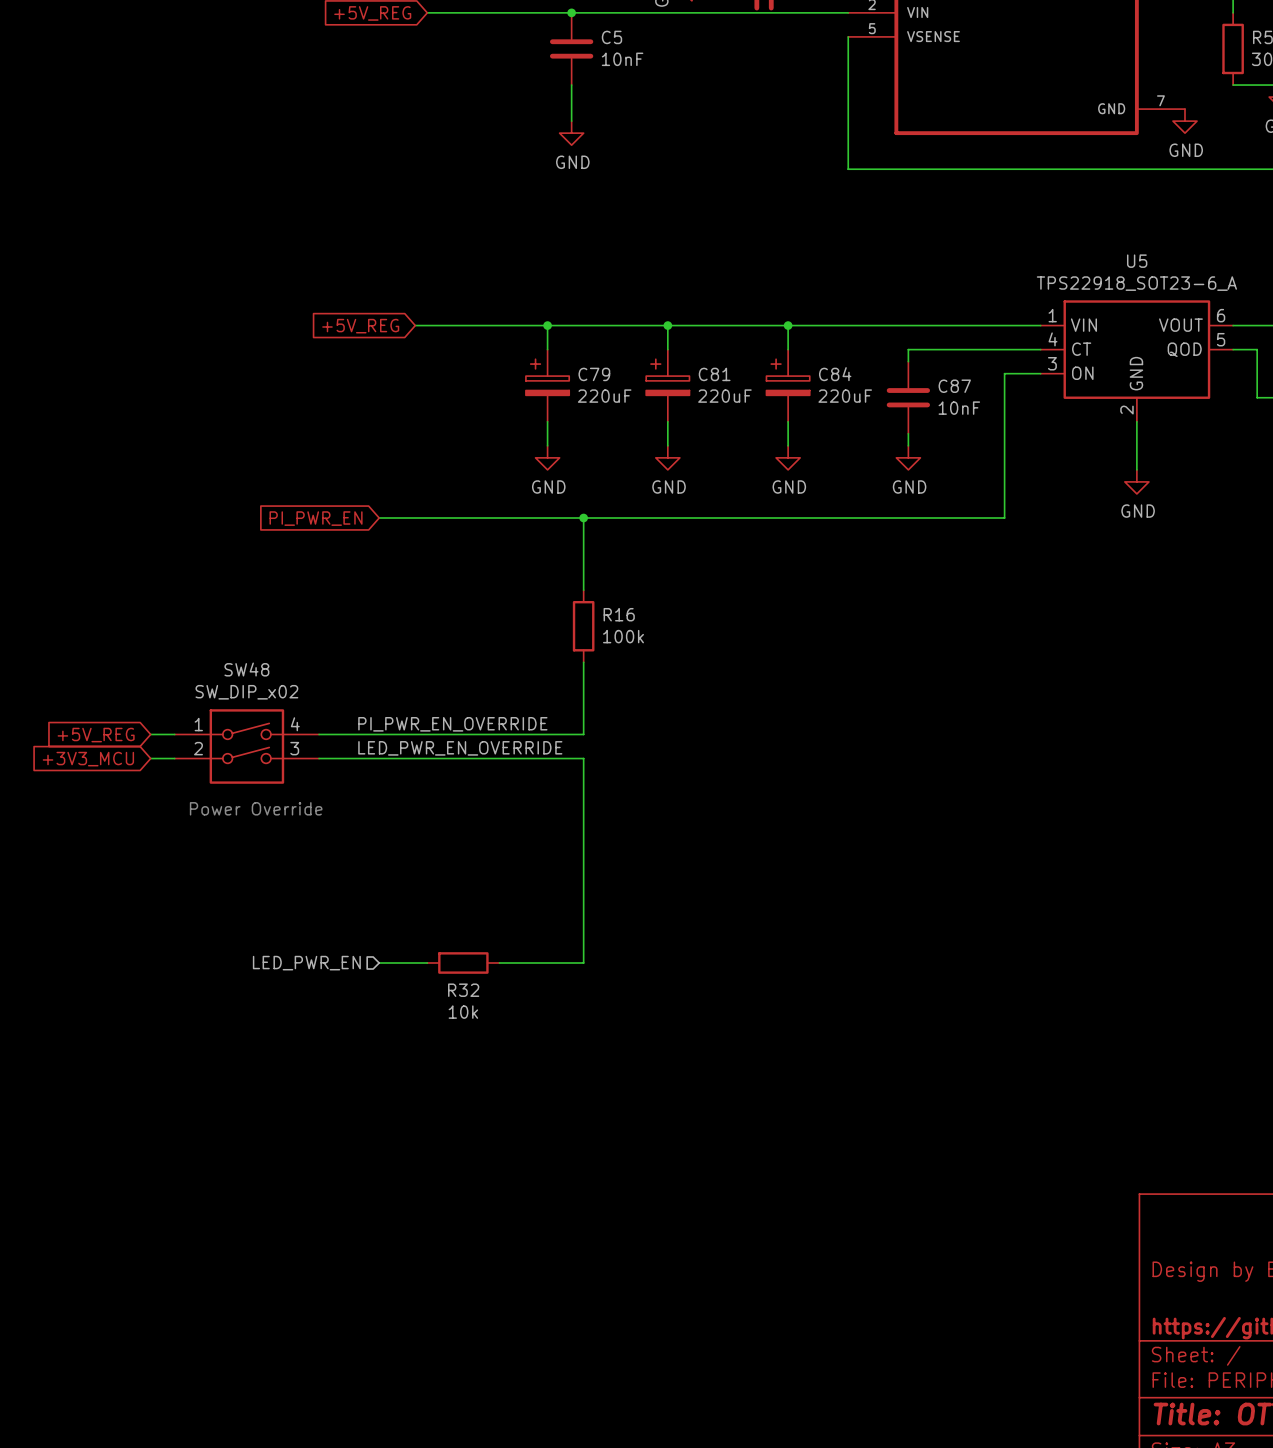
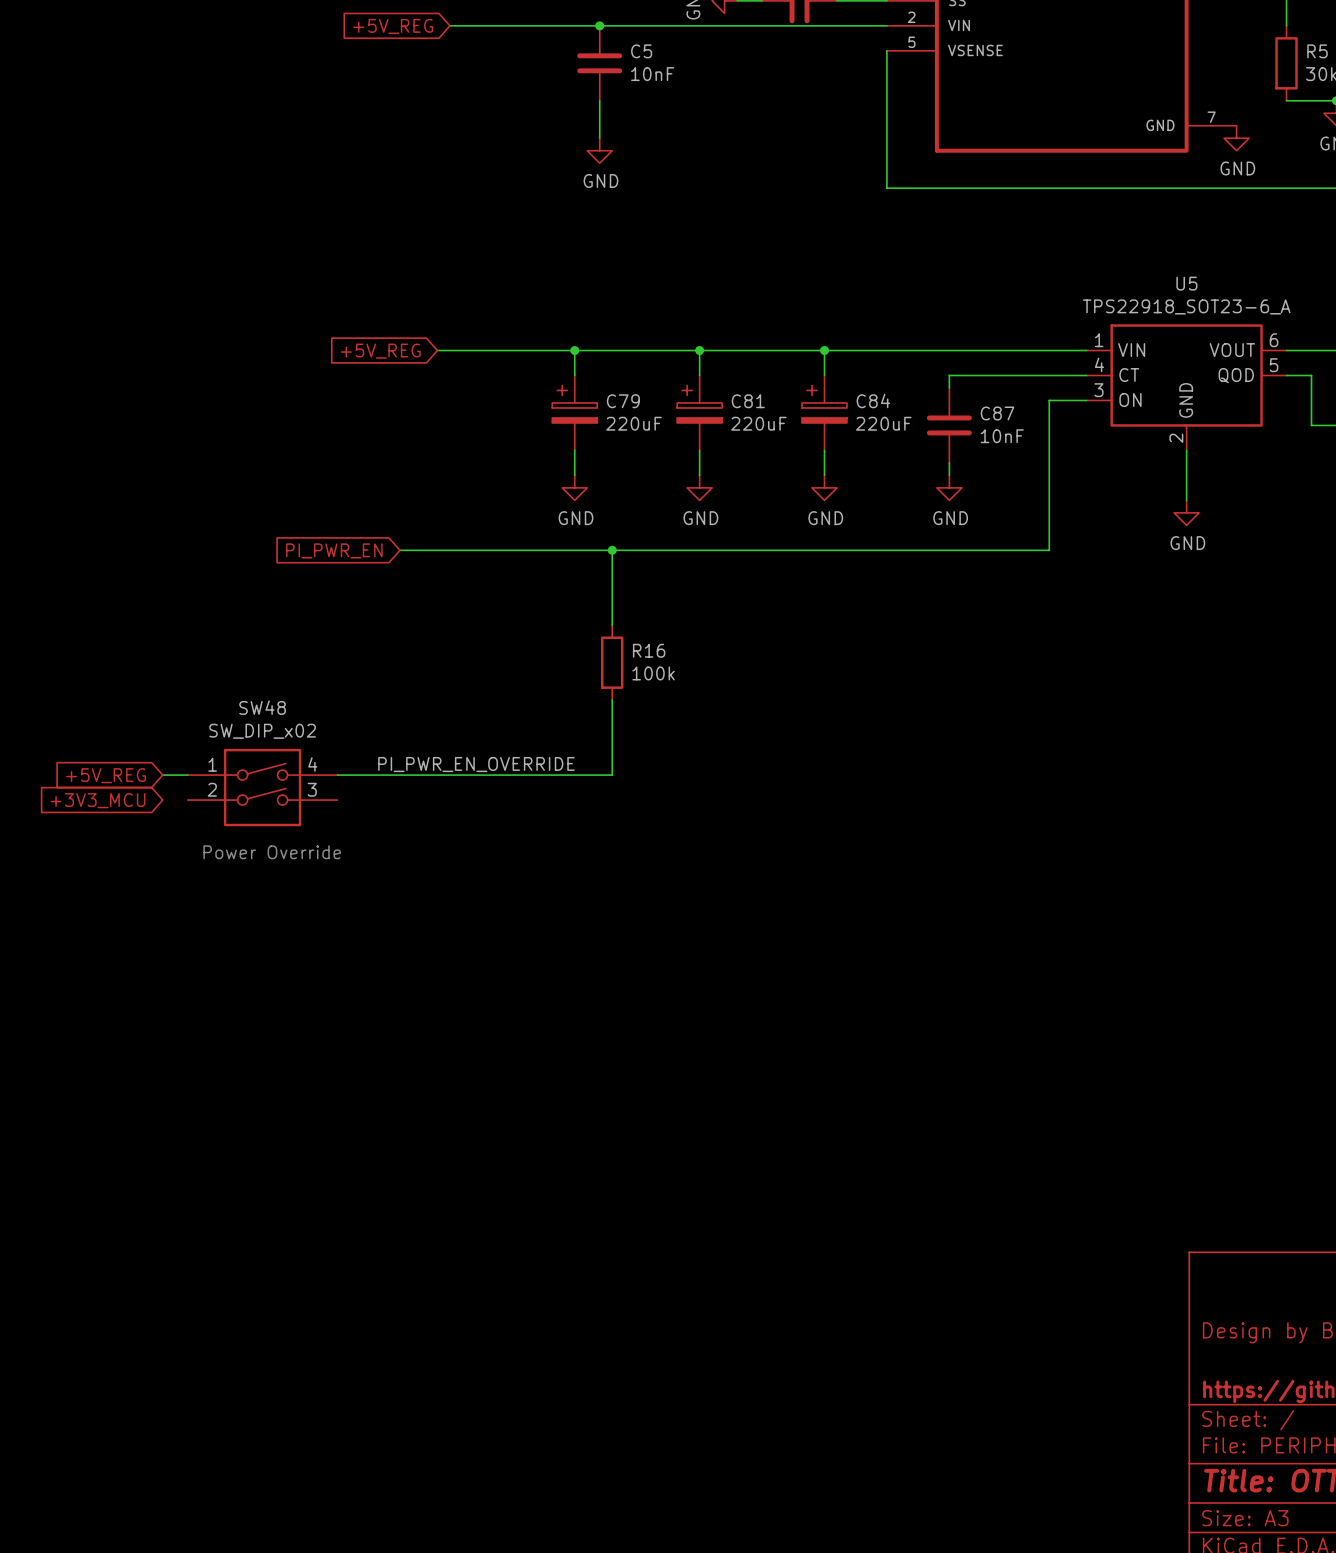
label: LED_PWR_EN_OVERRIDE (460, 748) -> none
wire: (150, 758) (174, 758) -> none
wire: (319, 758) (583, 758) (583, 962) (499, 962) -> none
wire: (379, 962) (427, 962) -> none
R32: 10k (463, 962) -> none
hierarchical label: LED_PWR_EN (306, 963) -> none

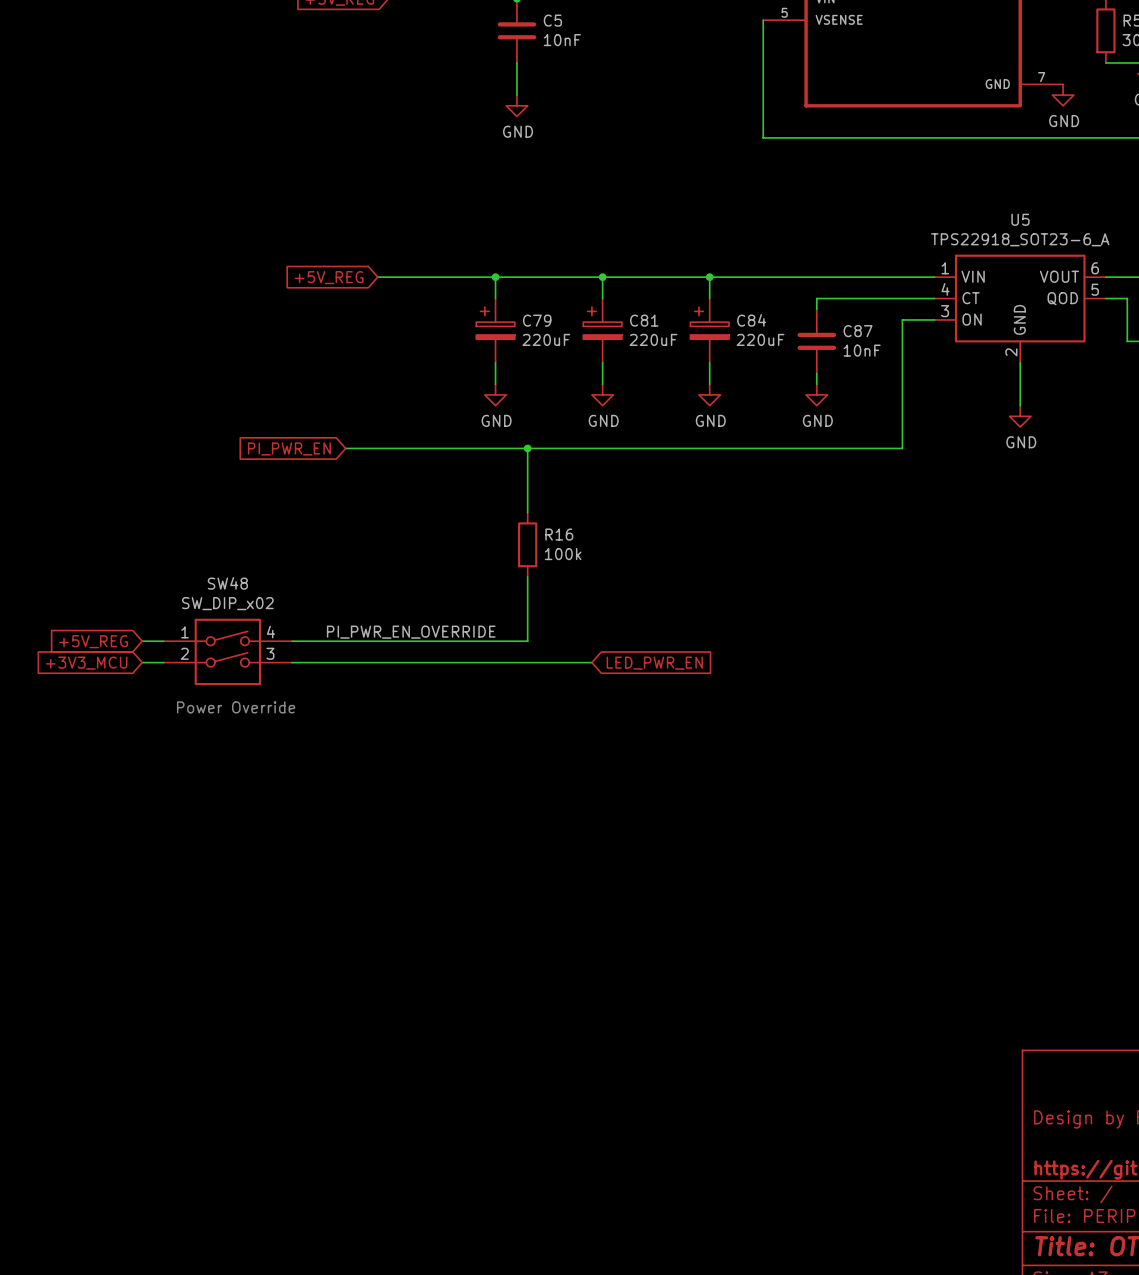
wire: none -> (142, 662) (163, 662)
wire: none -> (292, 662) (591, 662)
global label: none -> LED_PWR_EN (654, 663)

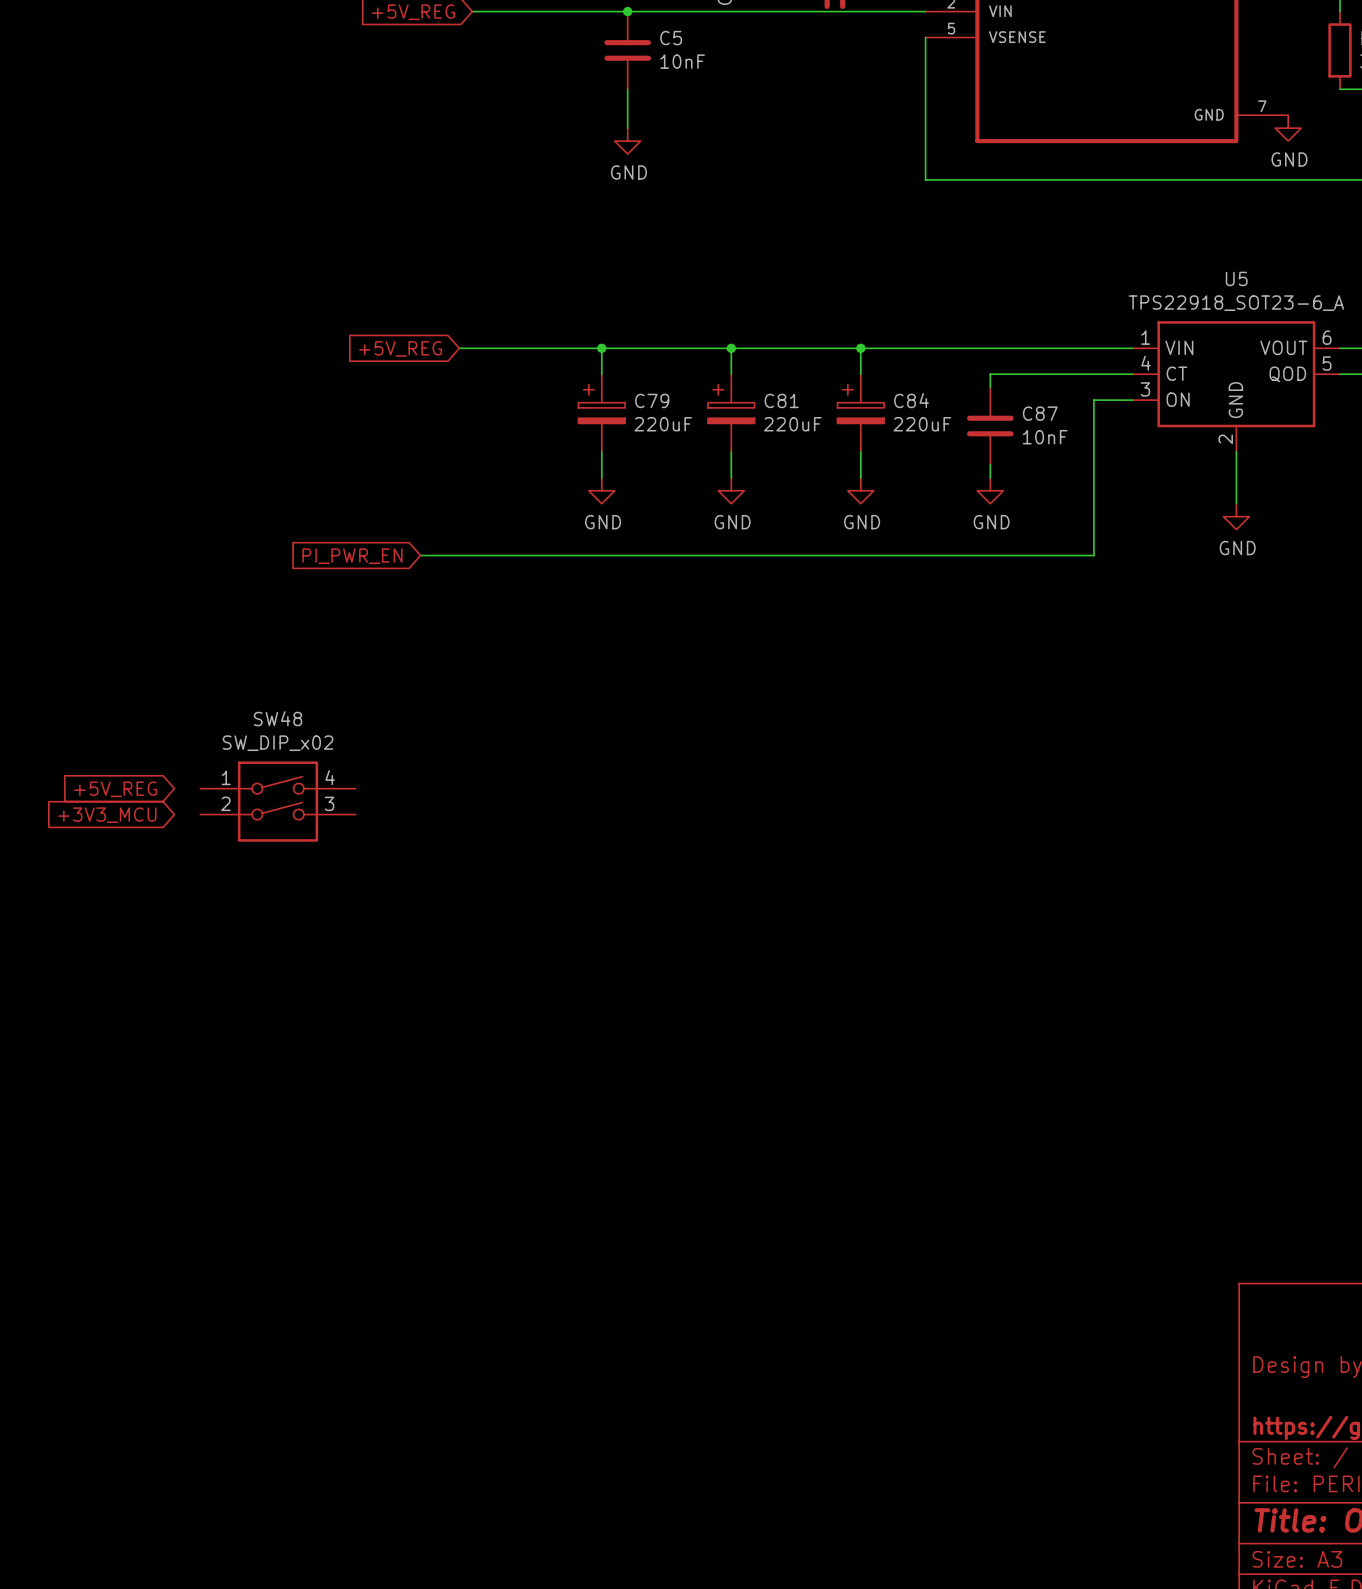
wire: (527, 448) (527, 512) -> none
junction: (527, 448) -> none
R16: 100k (527, 544) -> none
wire: (527, 576) (527, 641) (292, 641) -> none
label: PI_PWR_EN_OVERRIDE (411, 632) -> none
wire: (142, 641) (163, 641) -> none
wire: (142, 662) (163, 662) -> none
wire: (292, 662) (591, 662) -> none
global label: LED_PWR_EN (654, 663) -> none
text: Power Override (236, 707) -> none

